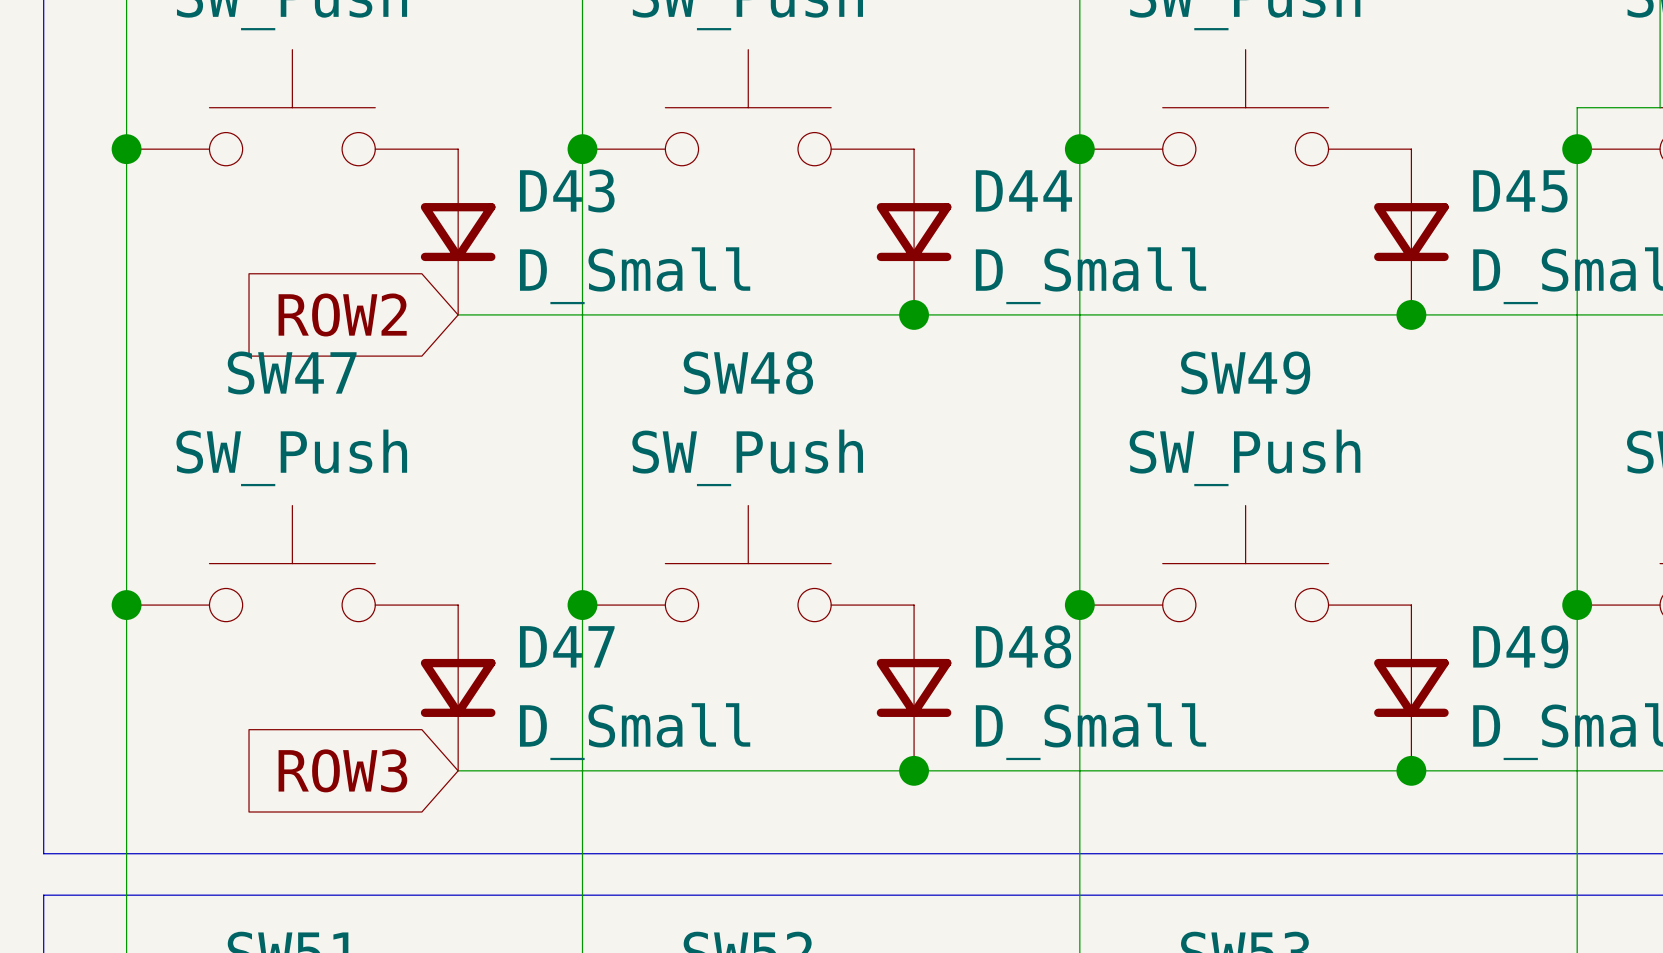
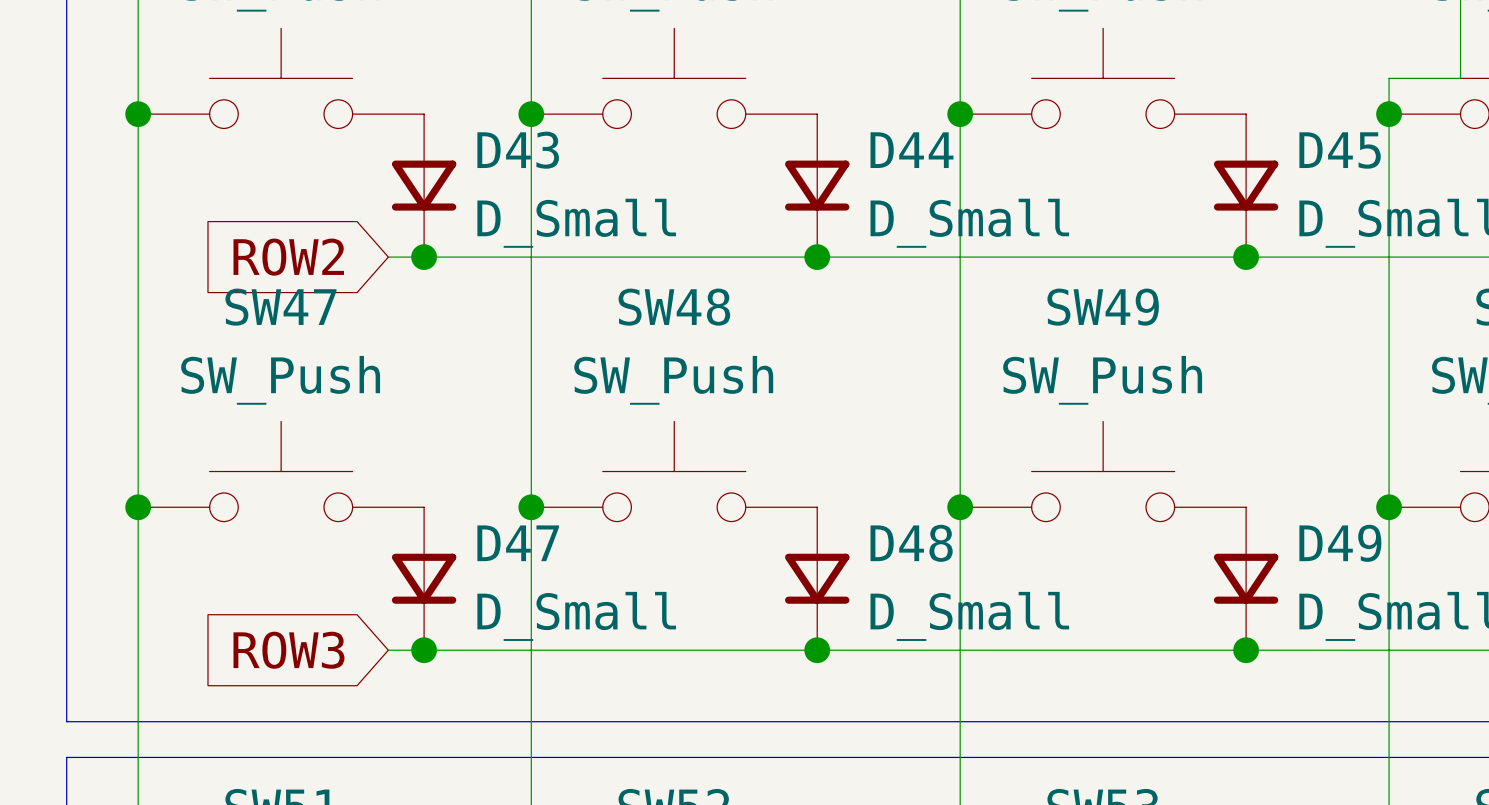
global label position: ROW2 (342, 314) -> ROW2 (288, 257)
wire: none -> (388, 257) (424, 257)
junction: none -> (424, 257)
global label position: ROW3 (342, 770) -> ROW3 (288, 650)
wire: none -> (388, 650) (424, 650)
junction: none -> (424, 650)

